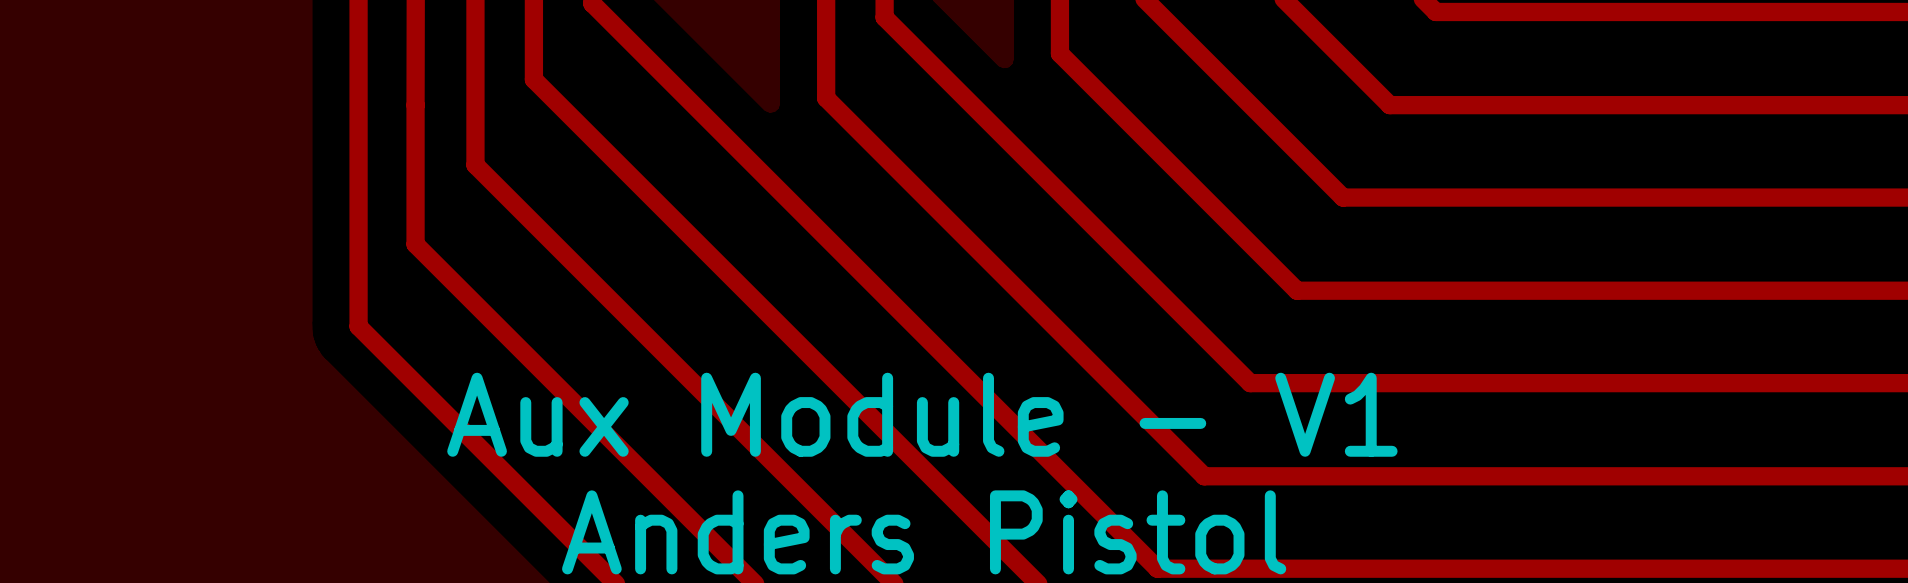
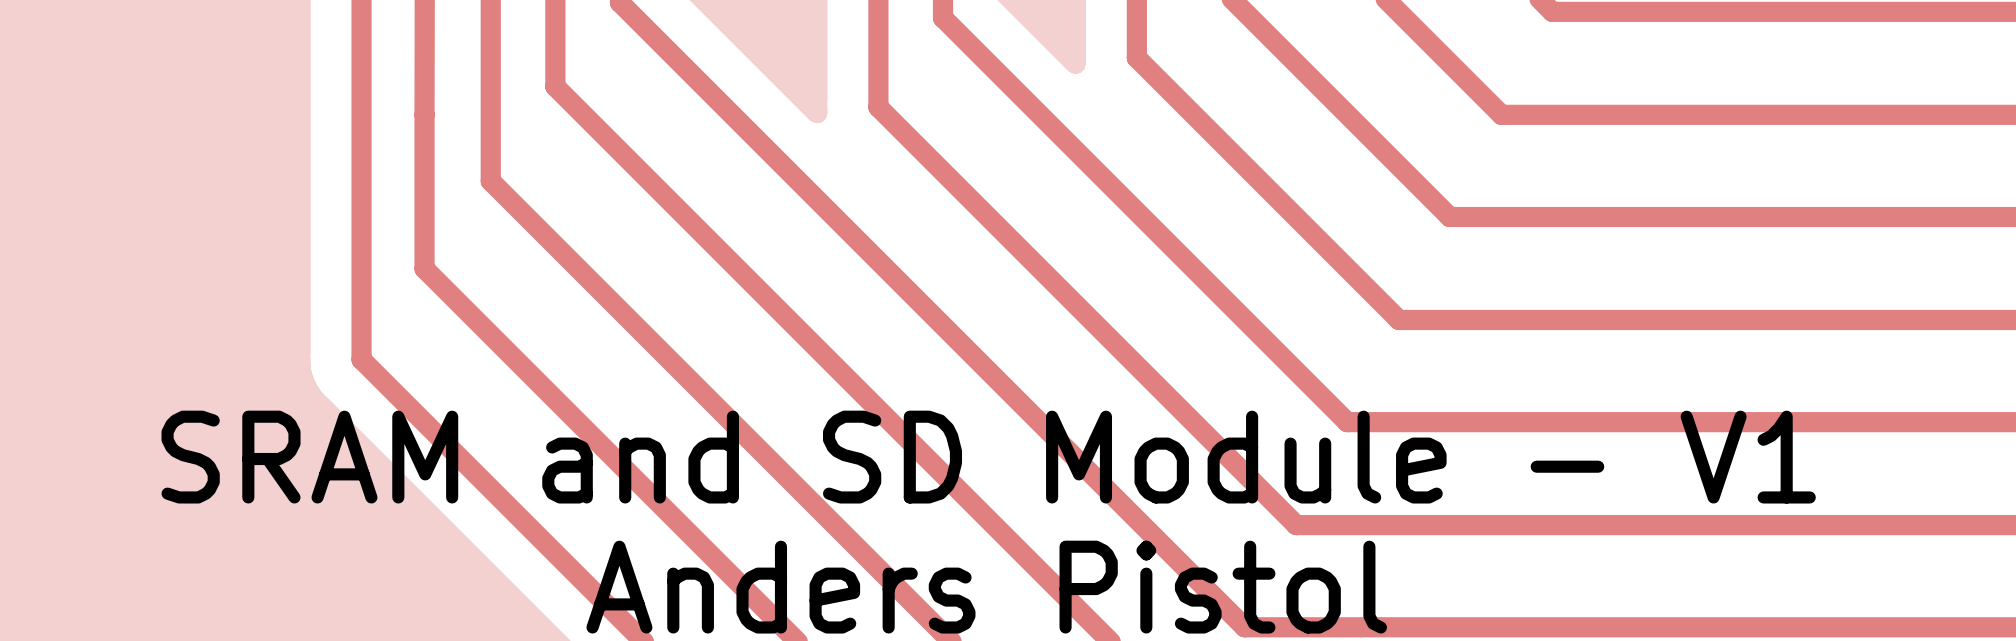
text: Aux Module - V1 (922, 414) -> SRAM and SD Module - V1 (988, 457)

